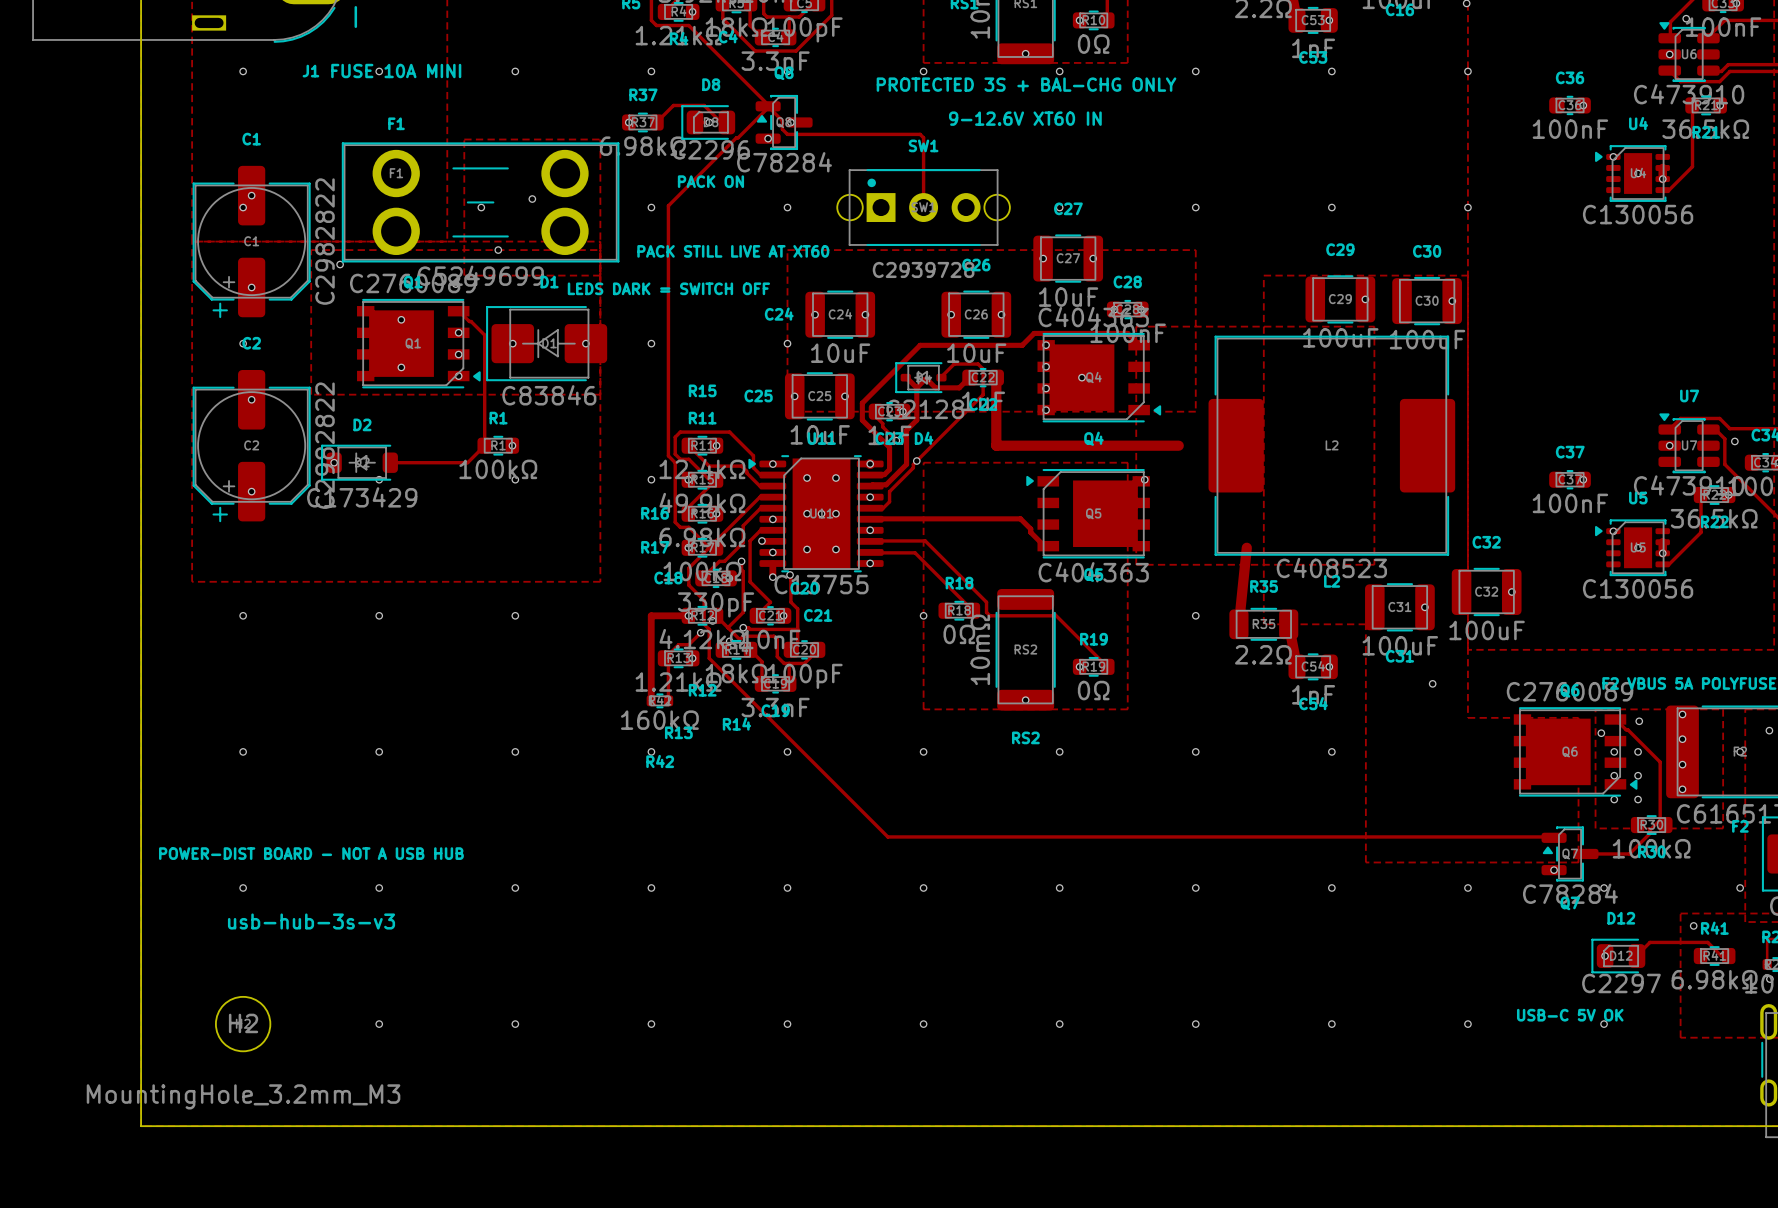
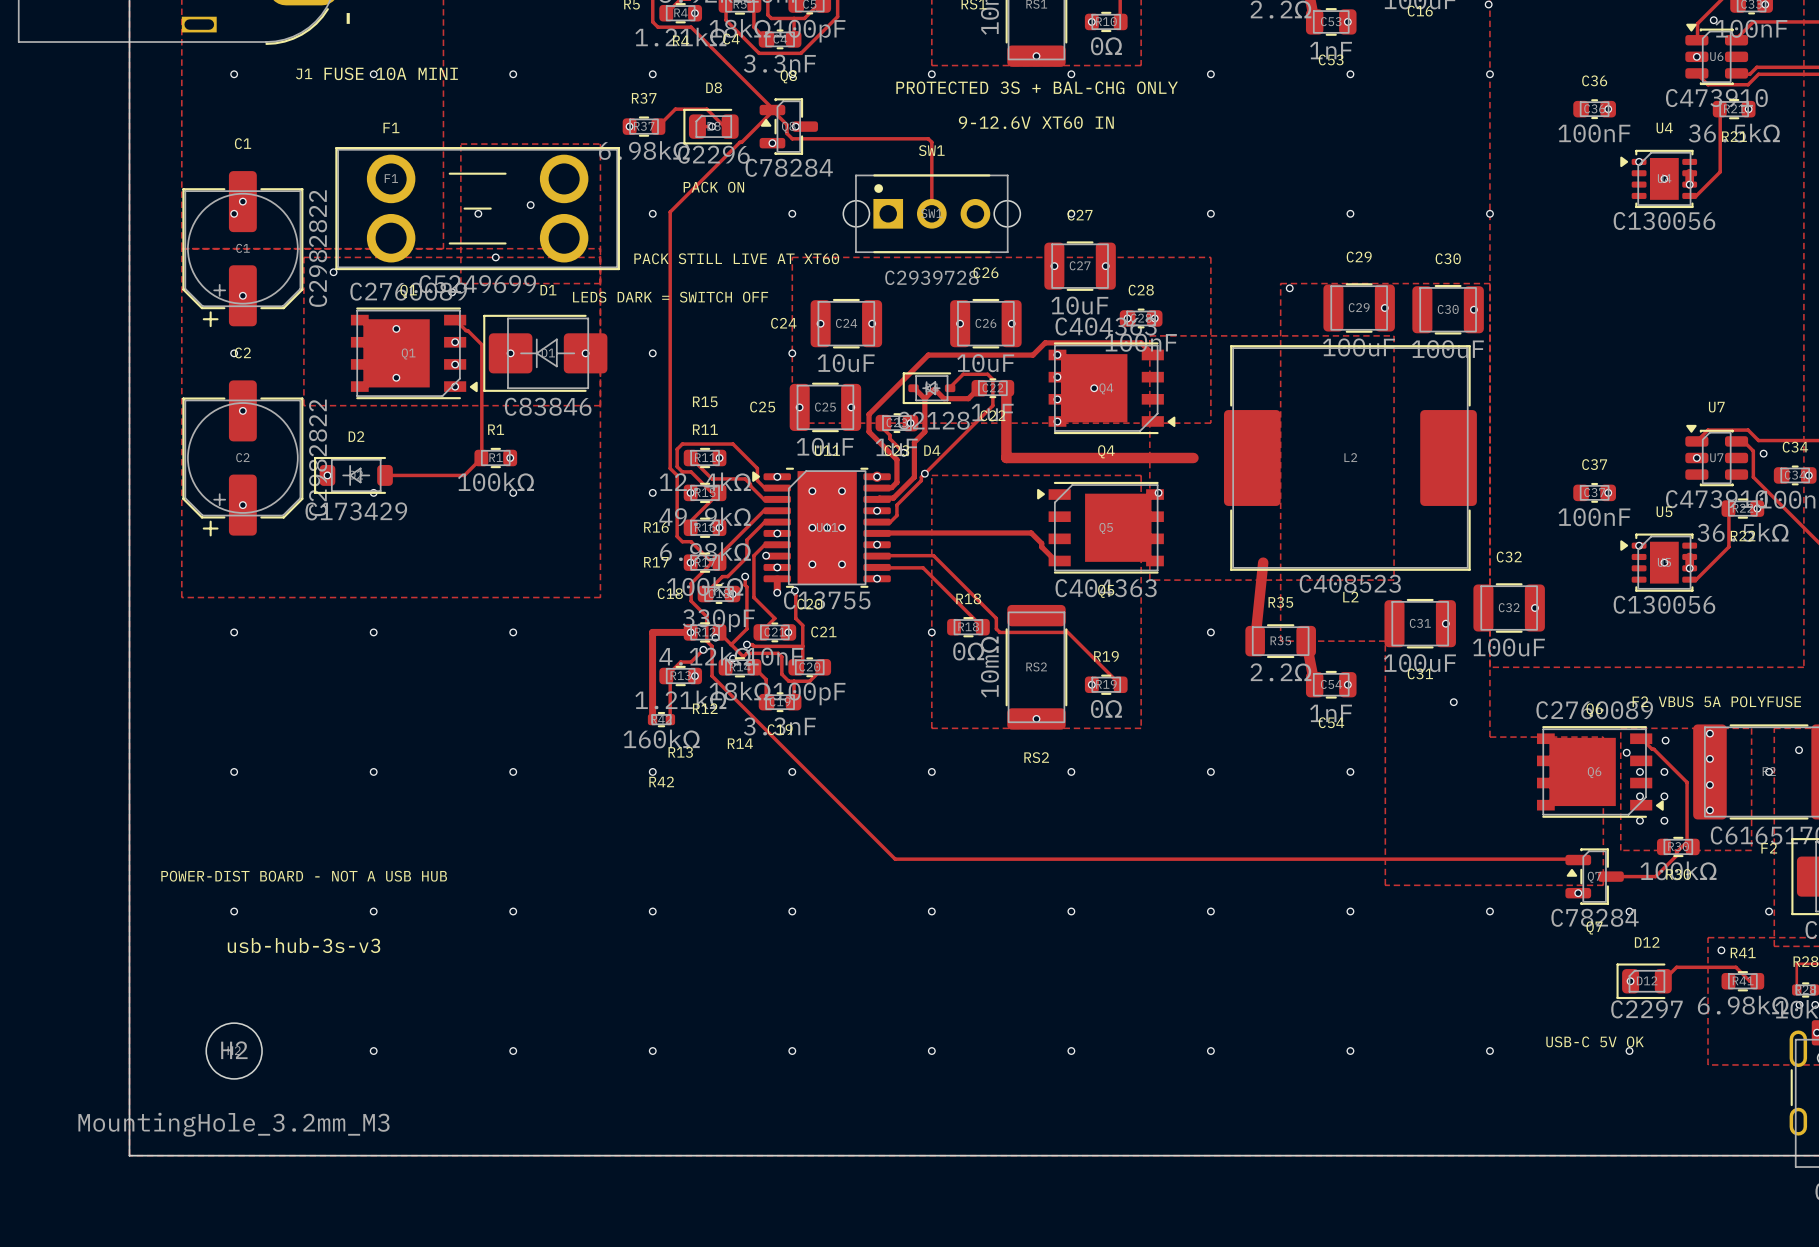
via: none -> (1289, 288)

